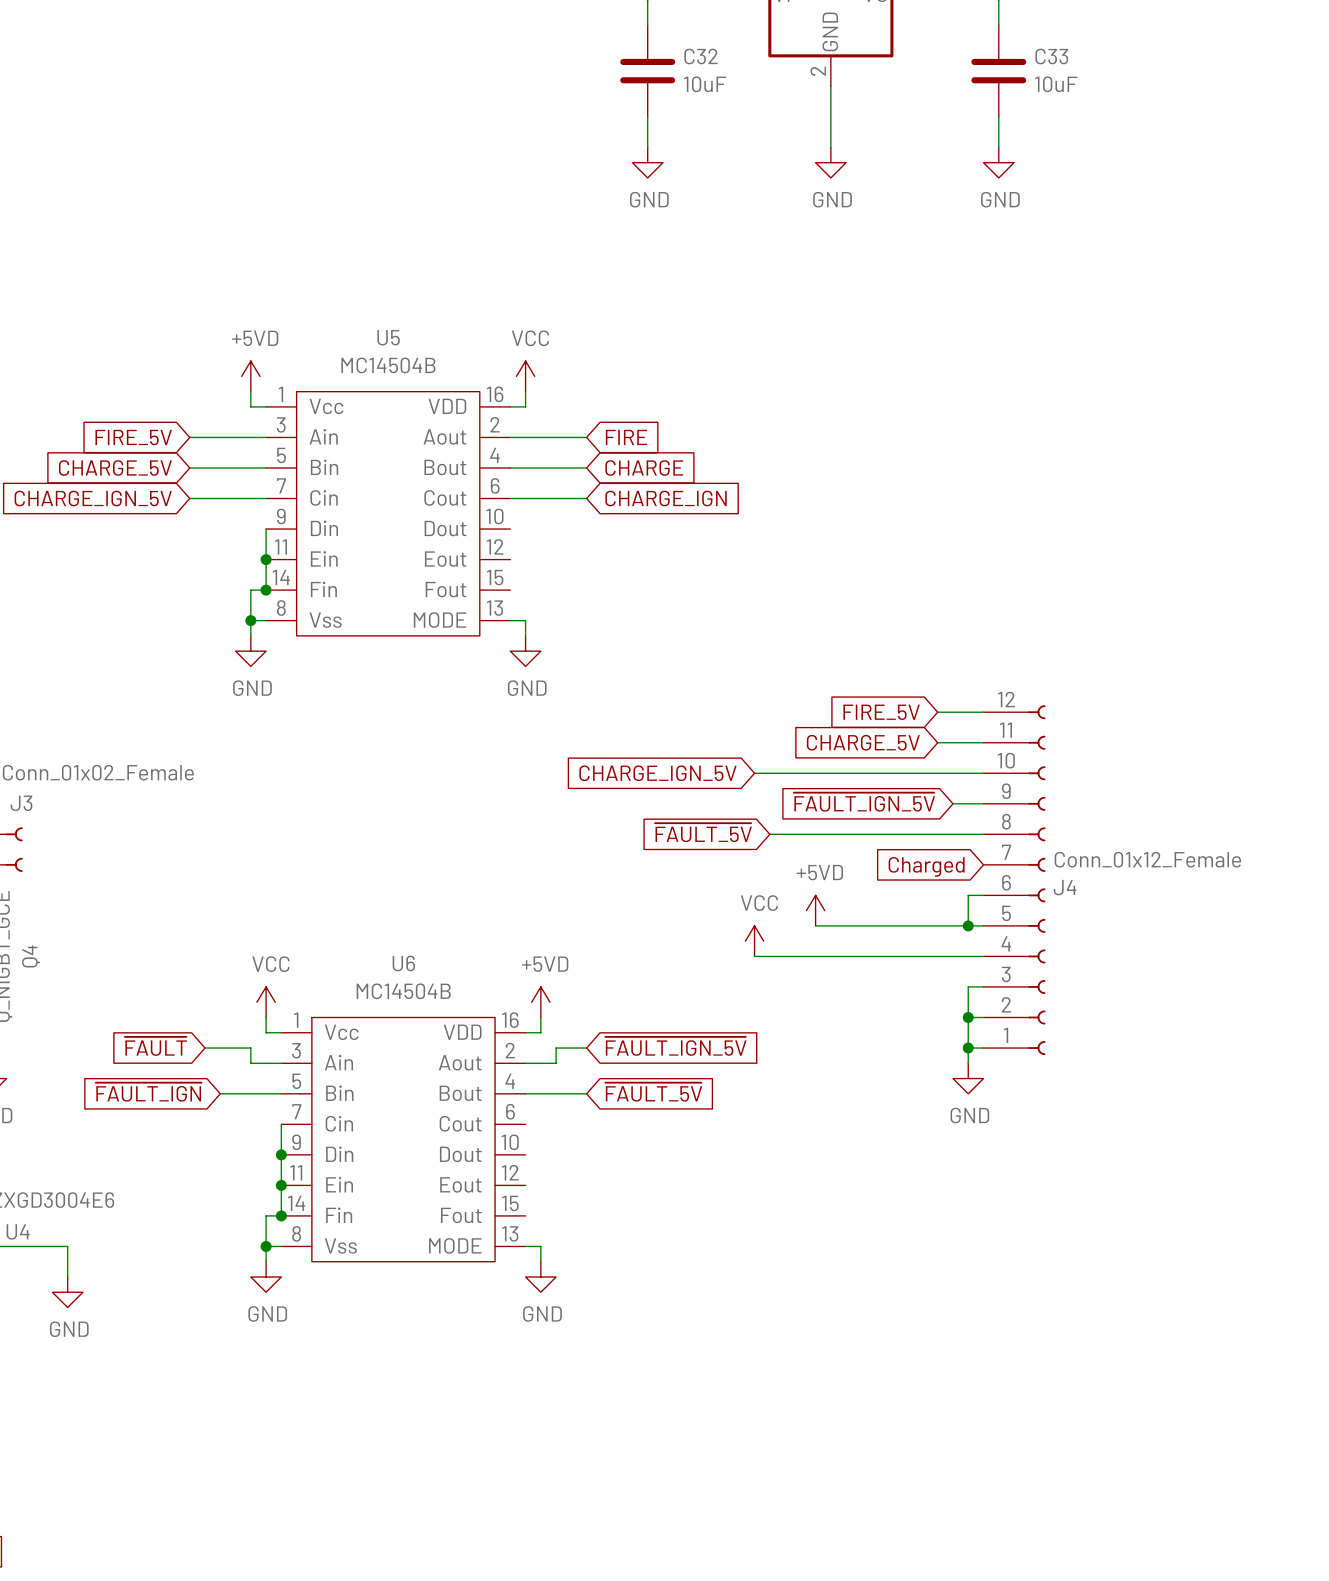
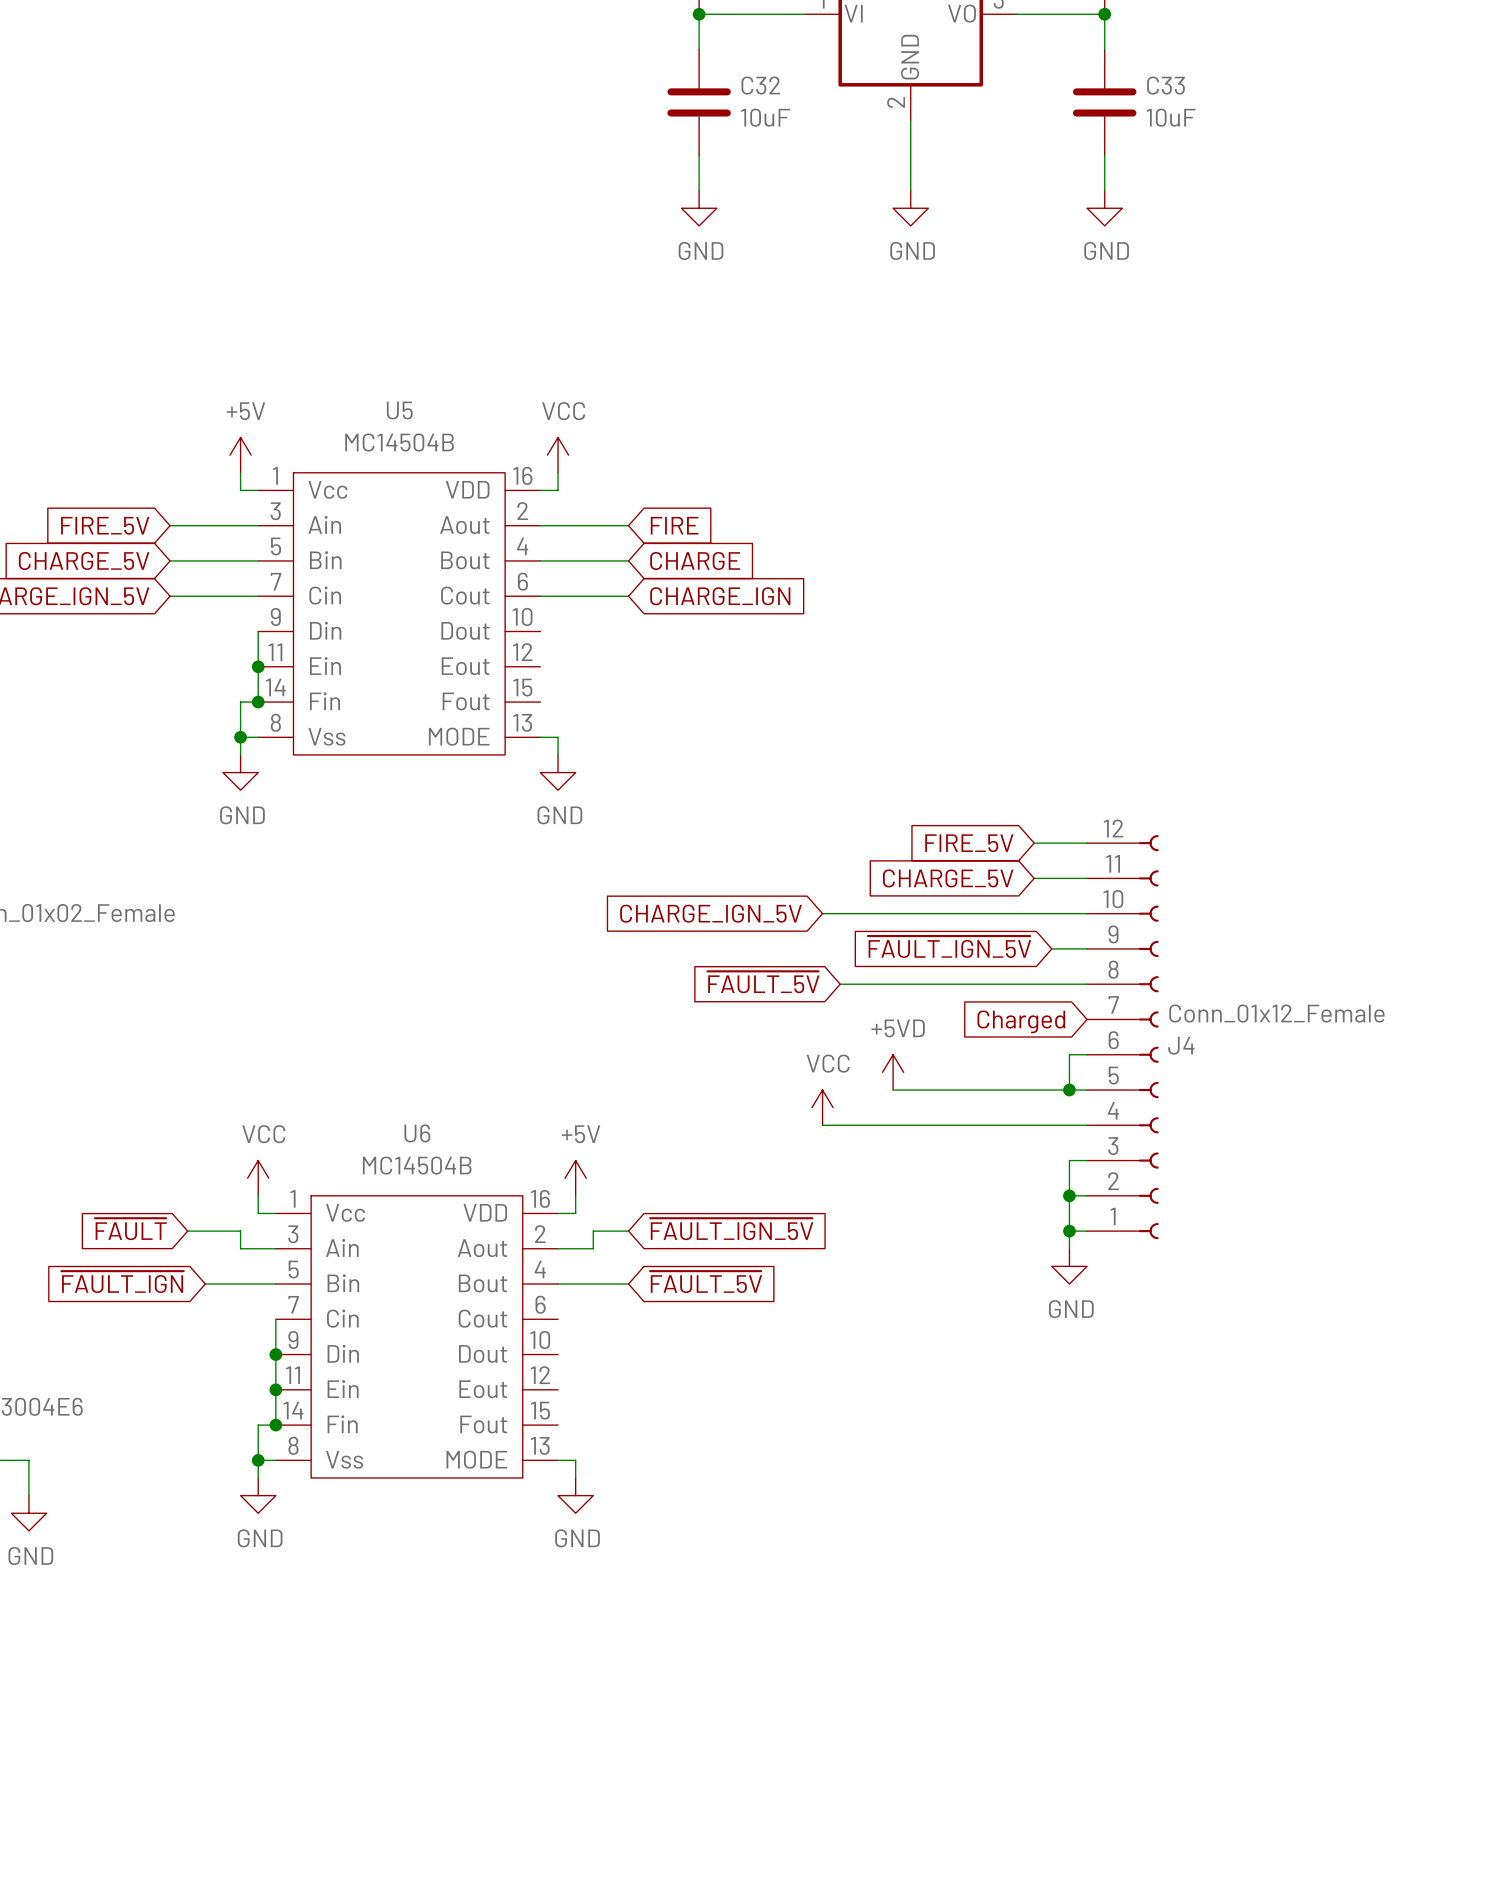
power symbol: +5VD (250, 376) -> +5V (240, 455)
power symbol: +5VD (540, 1002) -> +5V (575, 1178)

